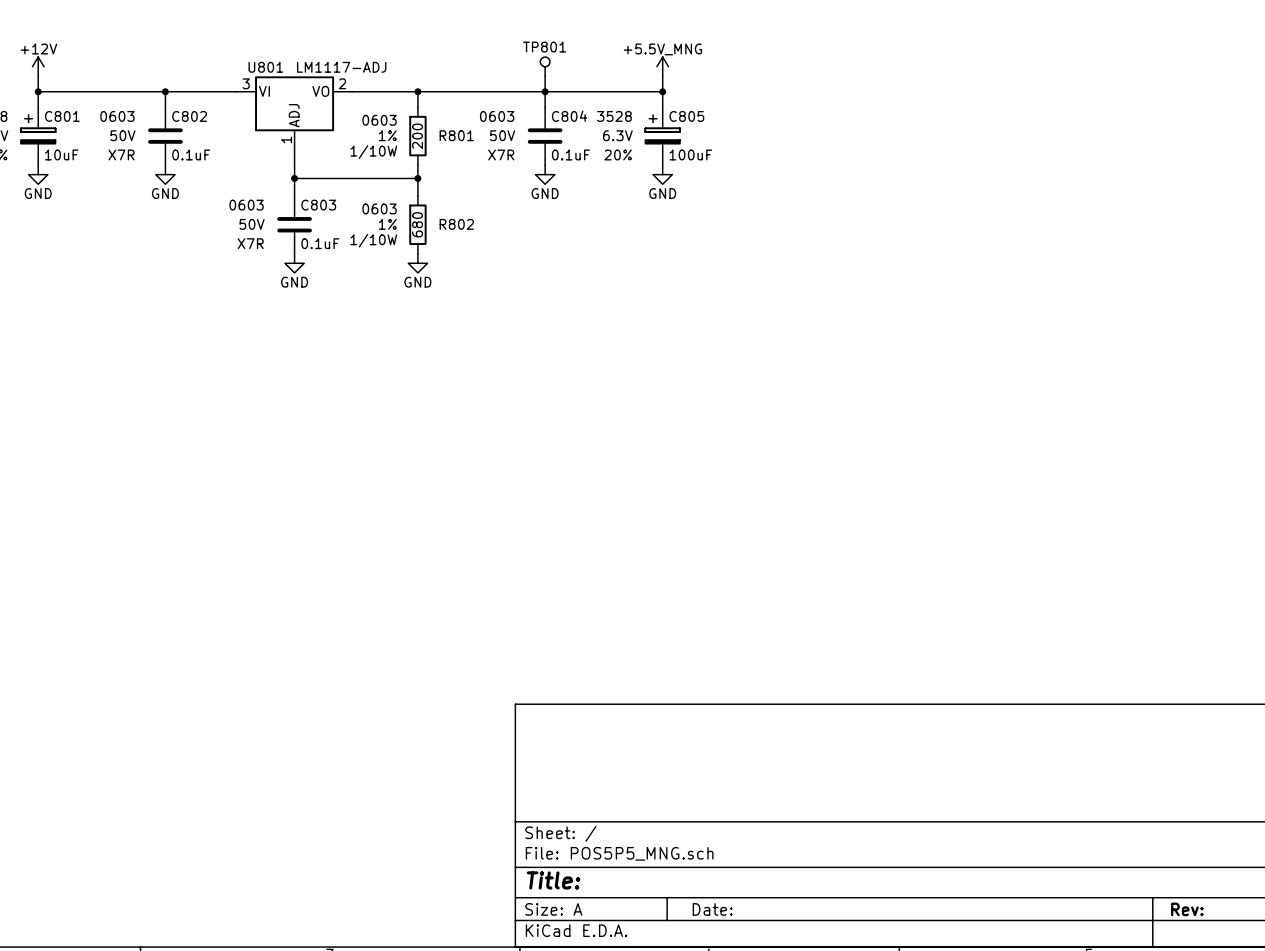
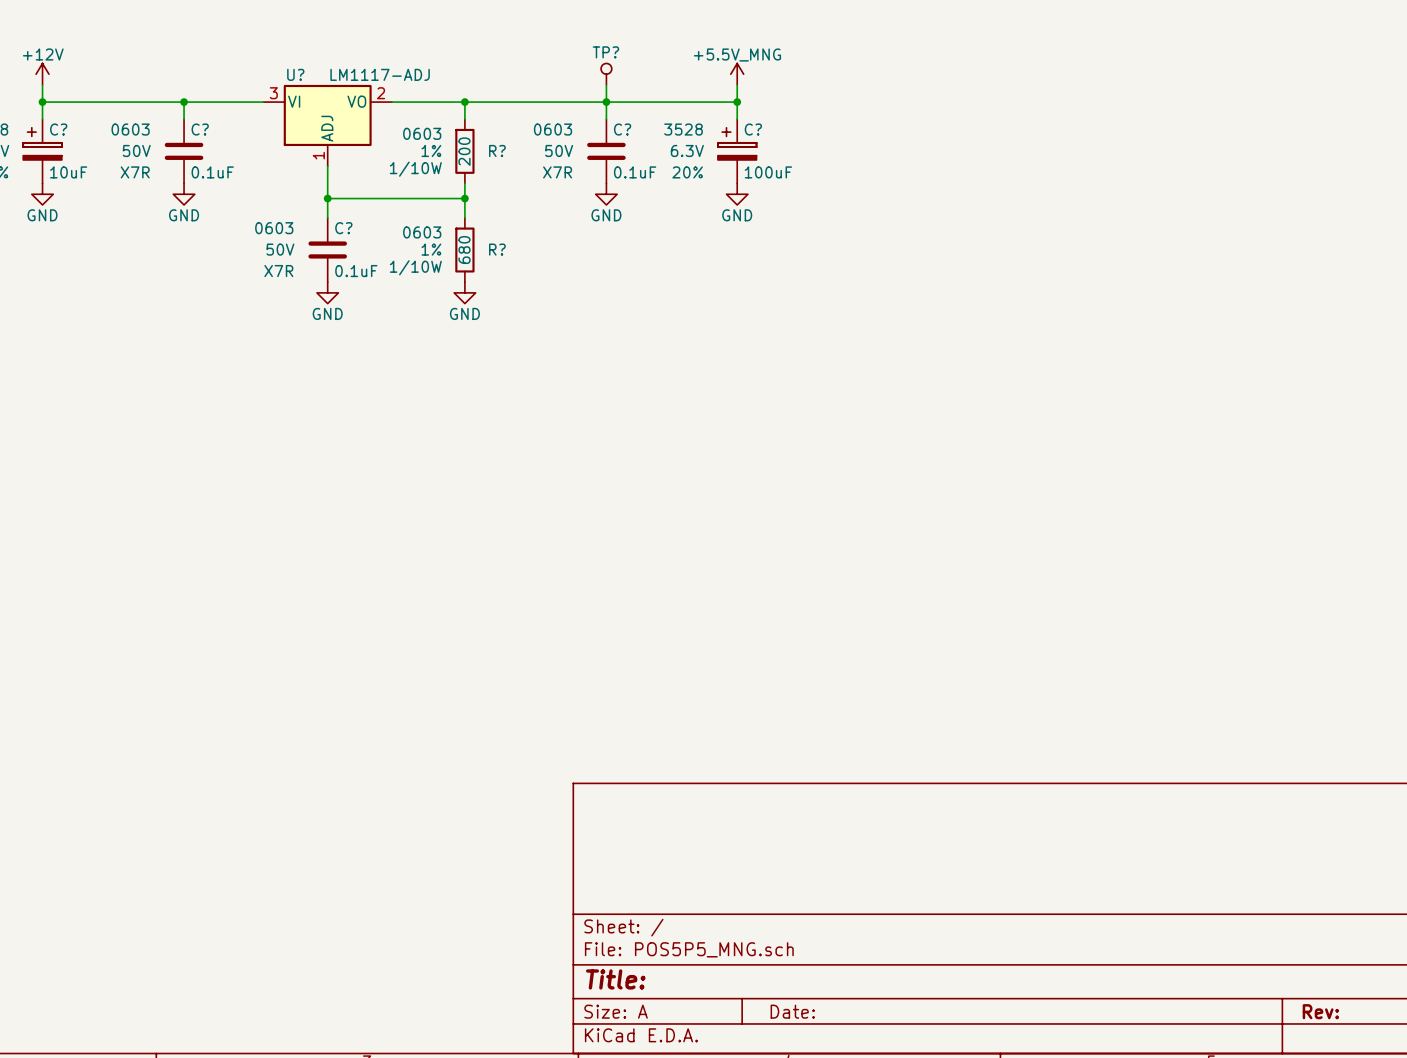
TP801 name: TP801 (544, 47) -> TP? (605, 52)
U801 name: U801 (265, 67) -> U? (295, 74)
C801 name: C801 (62, 116) -> C? (58, 129)
C802 name: C802 (189, 116) -> C? (200, 129)
C804 name: C804 (569, 116) -> C? (622, 129)
C805 name: C805 (686, 116) -> C? (753, 129)
R801 name: R801 (456, 135) -> R? (497, 150)
C803 name: C803 (318, 205) -> C? (343, 228)
R802 name: R802 (456, 224) -> R? (497, 249)

